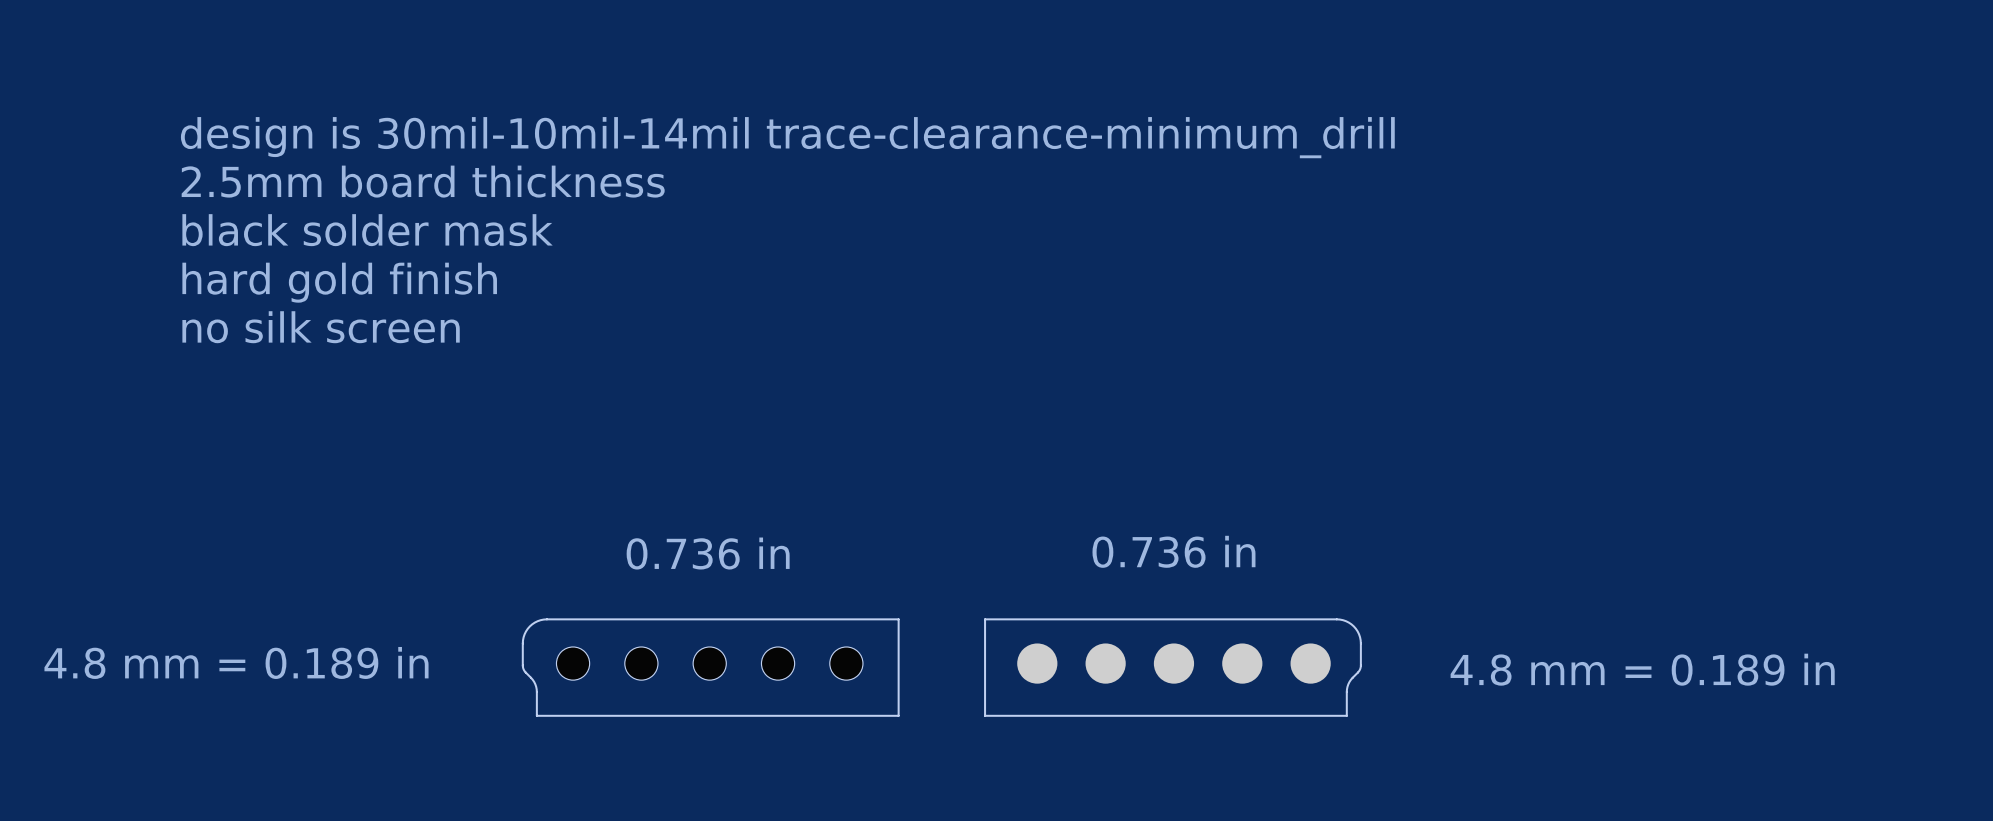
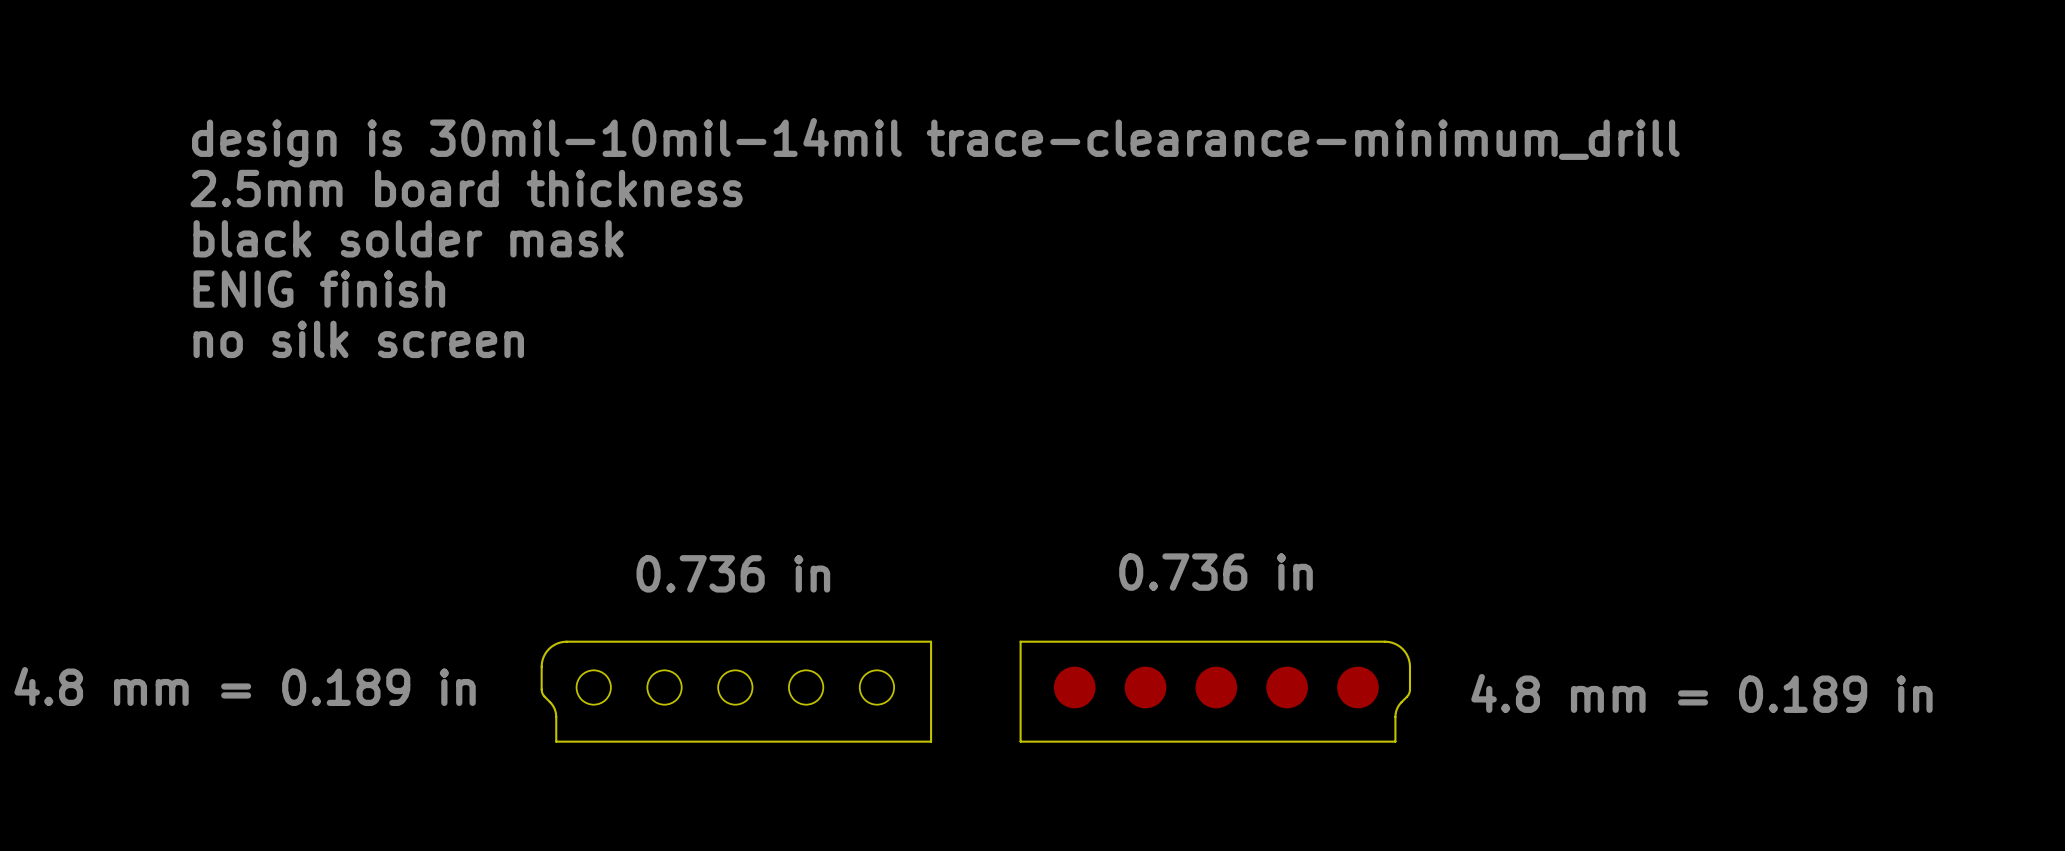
text: hard gold finish (339, 282) -> ENIG finish (319, 289)

